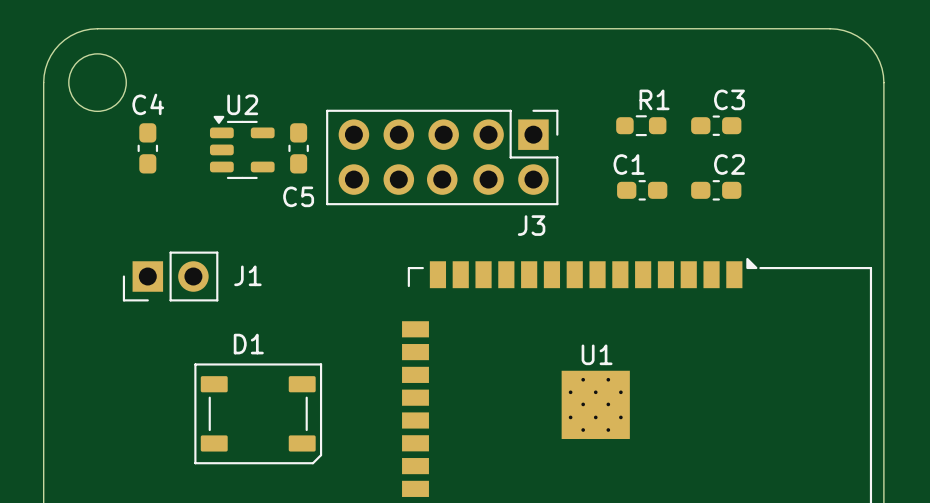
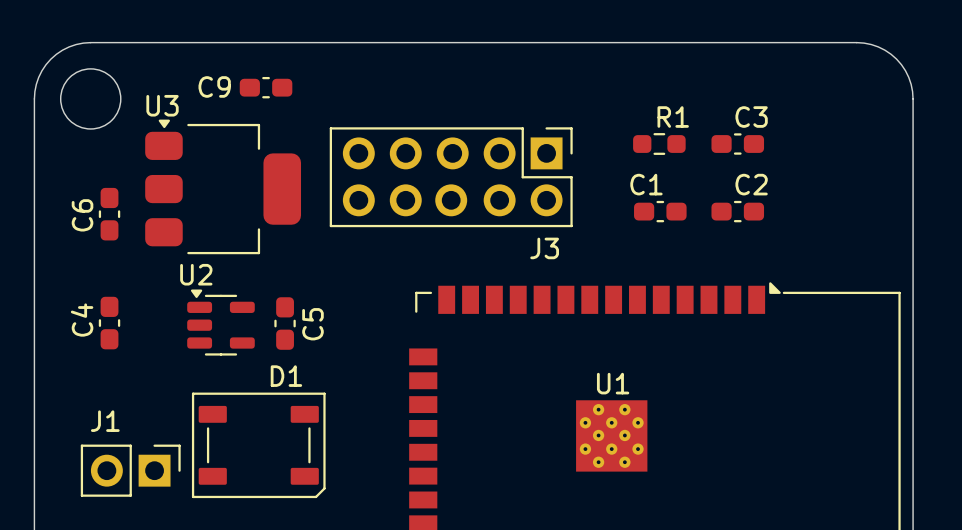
C9: none -> (266, 87)
C4 name rotation: 0° (148, 104) -> 90° counterclockwise (82, 320)
C4 name position: C4 (148, 104) -> C4 (82, 320)
U2 name position: U2 (242, 104) -> U2 (196, 274)
U2 position: (242, 147) -> (220, 322)
C4 position: (147, 148) -> (109, 323)
C5 position: (298, 148) -> (285, 323)
U3: none -> (223, 186)
C6: none -> (109, 214)
C5 name rotation: 0° (298, 196) -> 90° counterclockwise (312, 324)
C5 name position: C5 (298, 196) -> C5 (312, 324)
J1 name position: J1 (247, 275) -> J1 (105, 421)
J1 rotation: 0° (170, 276) -> 180° (130, 470)
J1 position: (170, 276) -> (130, 470)
D1 name position: D1 (248, 344) -> D1 (286, 376)

